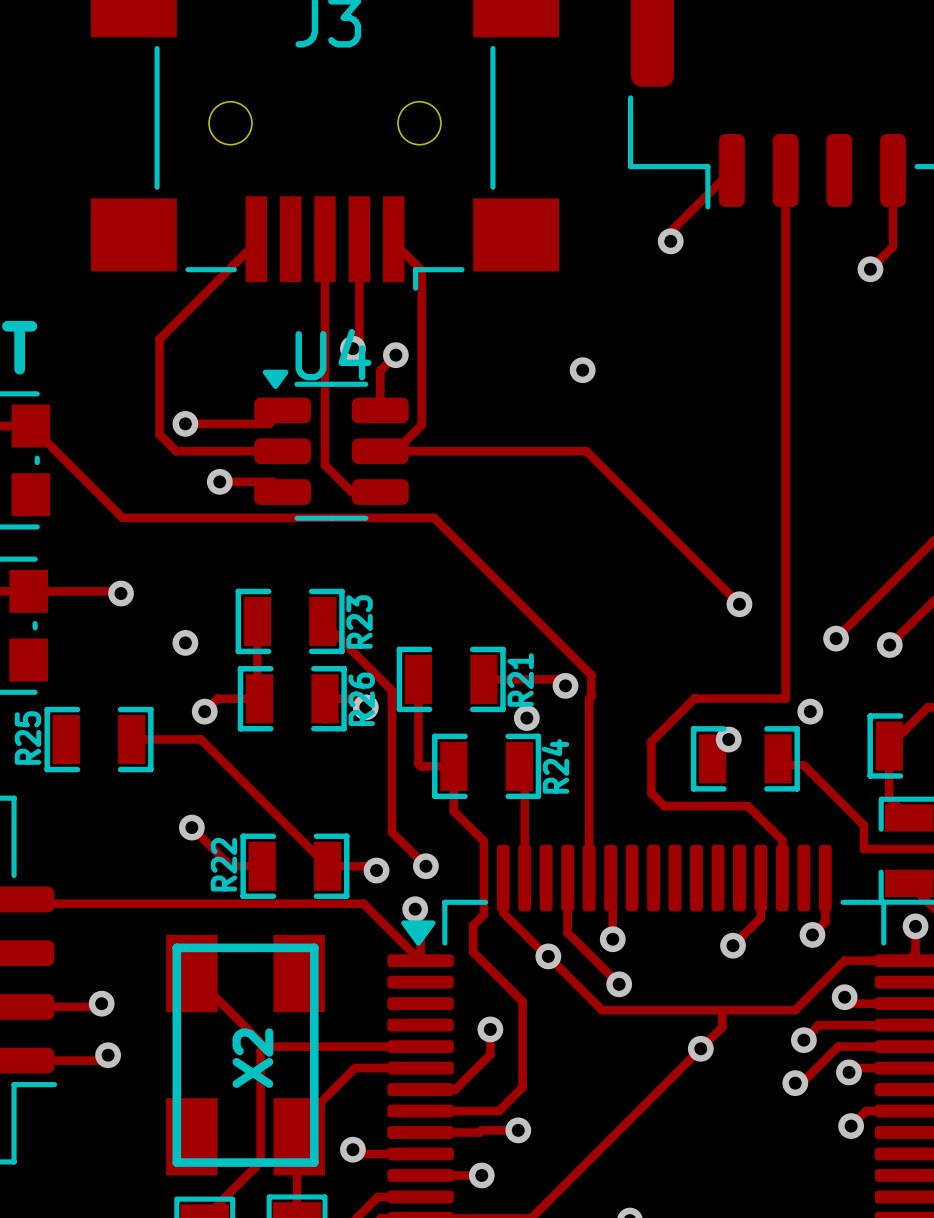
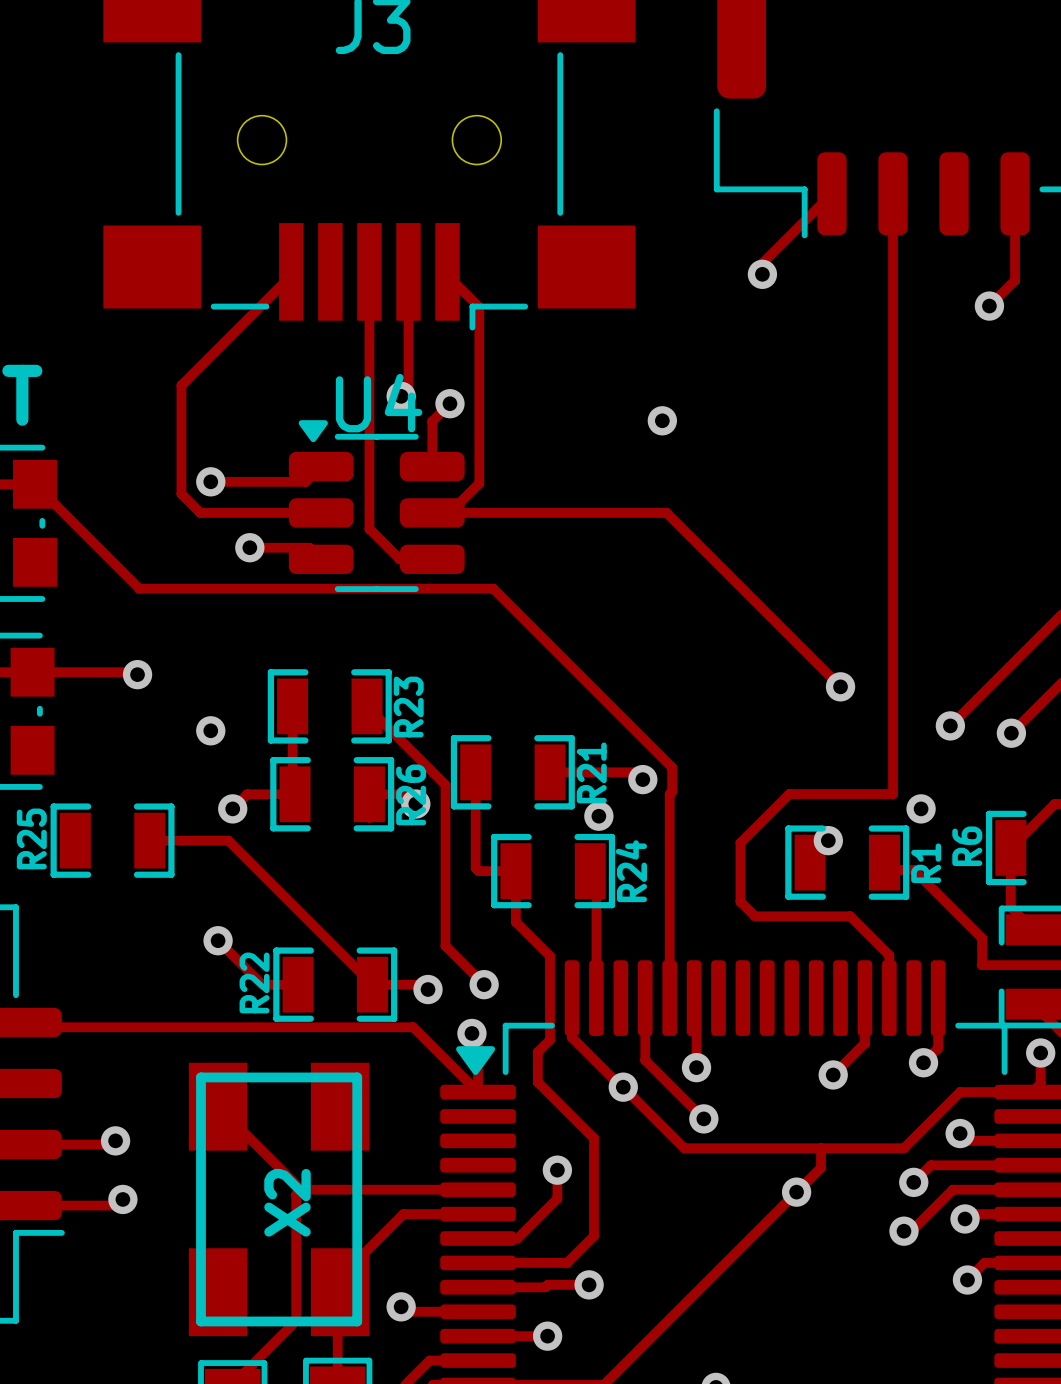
R6 name: none -> R6 (967, 846)
R1 name: none -> R1 (926, 863)

